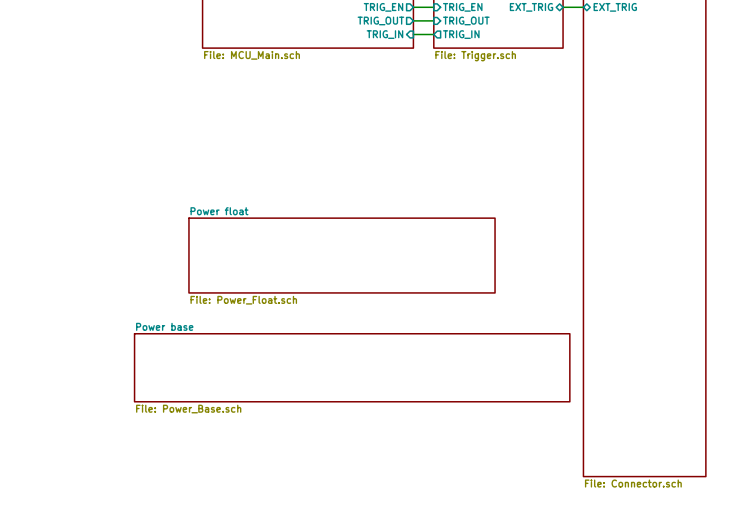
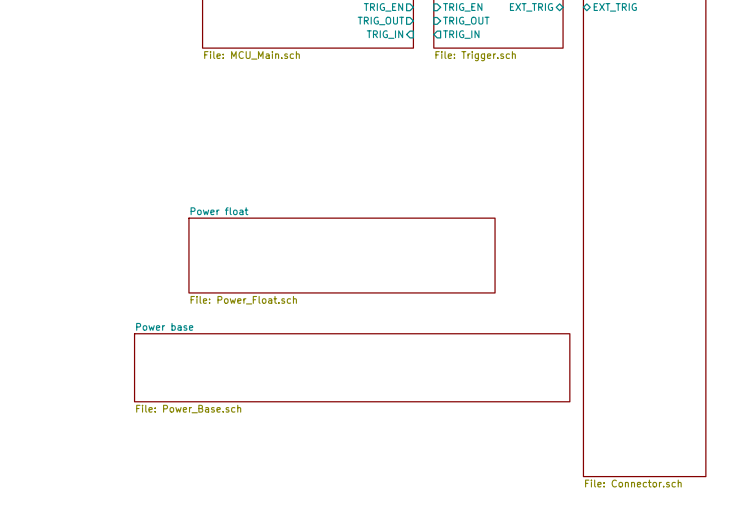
wire: (413, 7) (433, 7) -> none
wire: (563, 7) (583, 7) -> none
wire: (413, 20) (433, 20) -> none
wire: (413, 34) (433, 34) -> none

